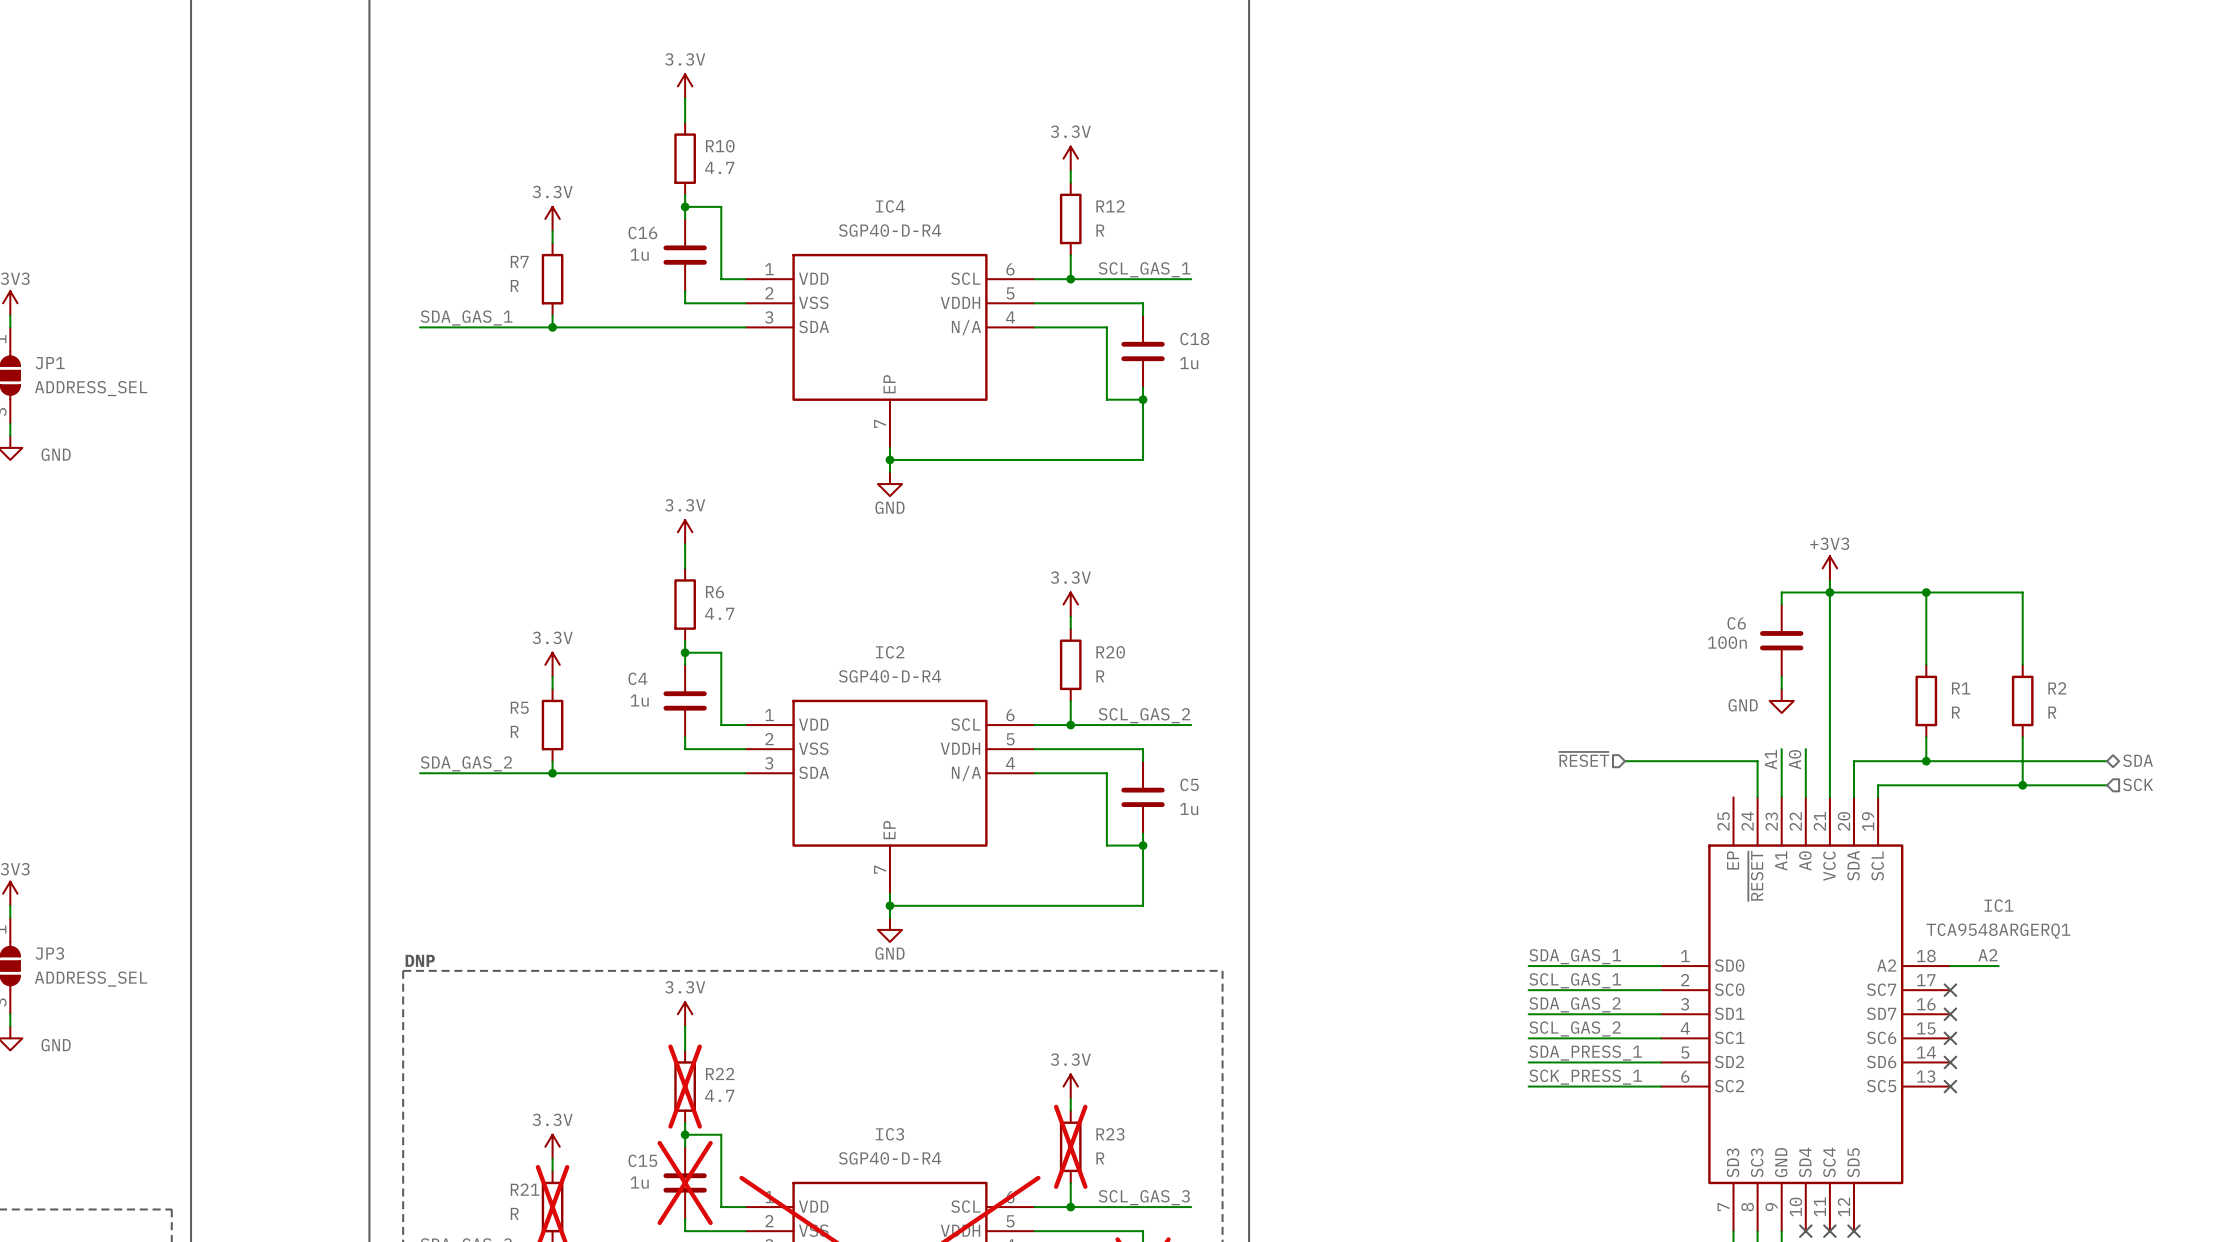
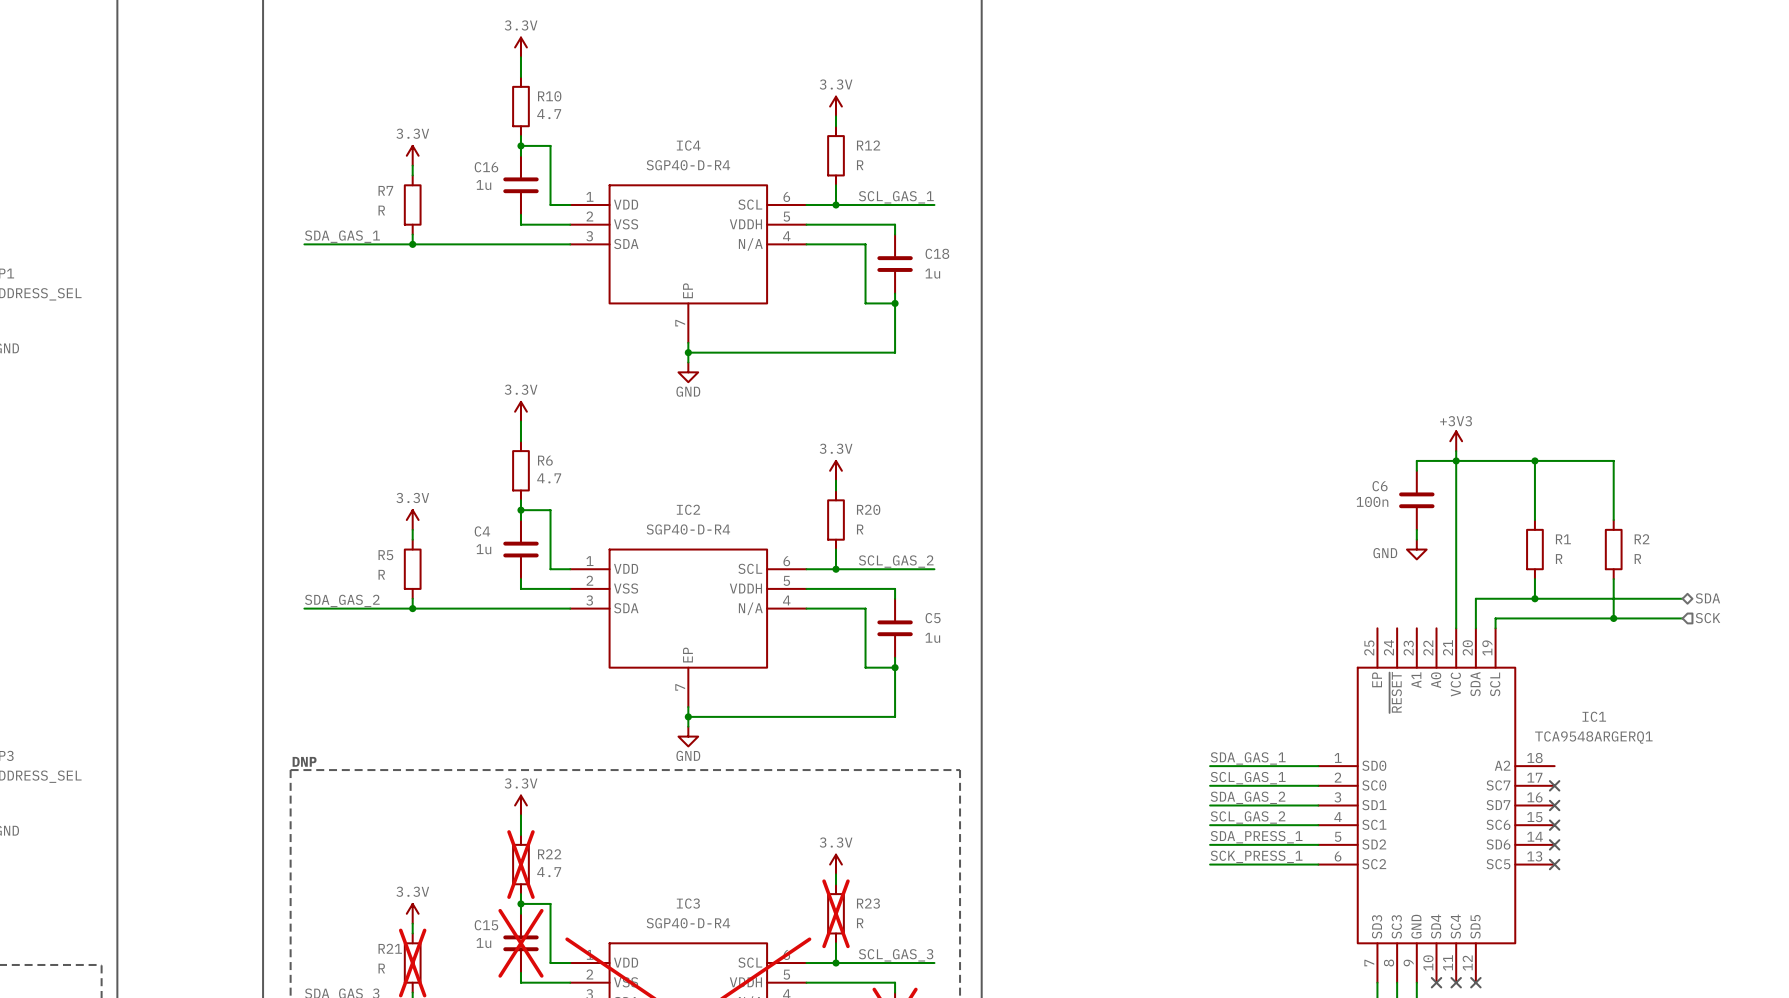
wire: (1781, 749) (1781, 797) -> none
wire: (1805, 749) (1805, 797) -> none
hierarchical label: ~{RESET} (1584, 759) -> none
label: A1 (1770, 759) -> none
label: A0 (1795, 759) -> none
wire: (1625, 761) (1757, 761) (1757, 797) -> none
label: A2 (1987, 955) -> none
wire: (1950, 966) (1998, 966) -> none

